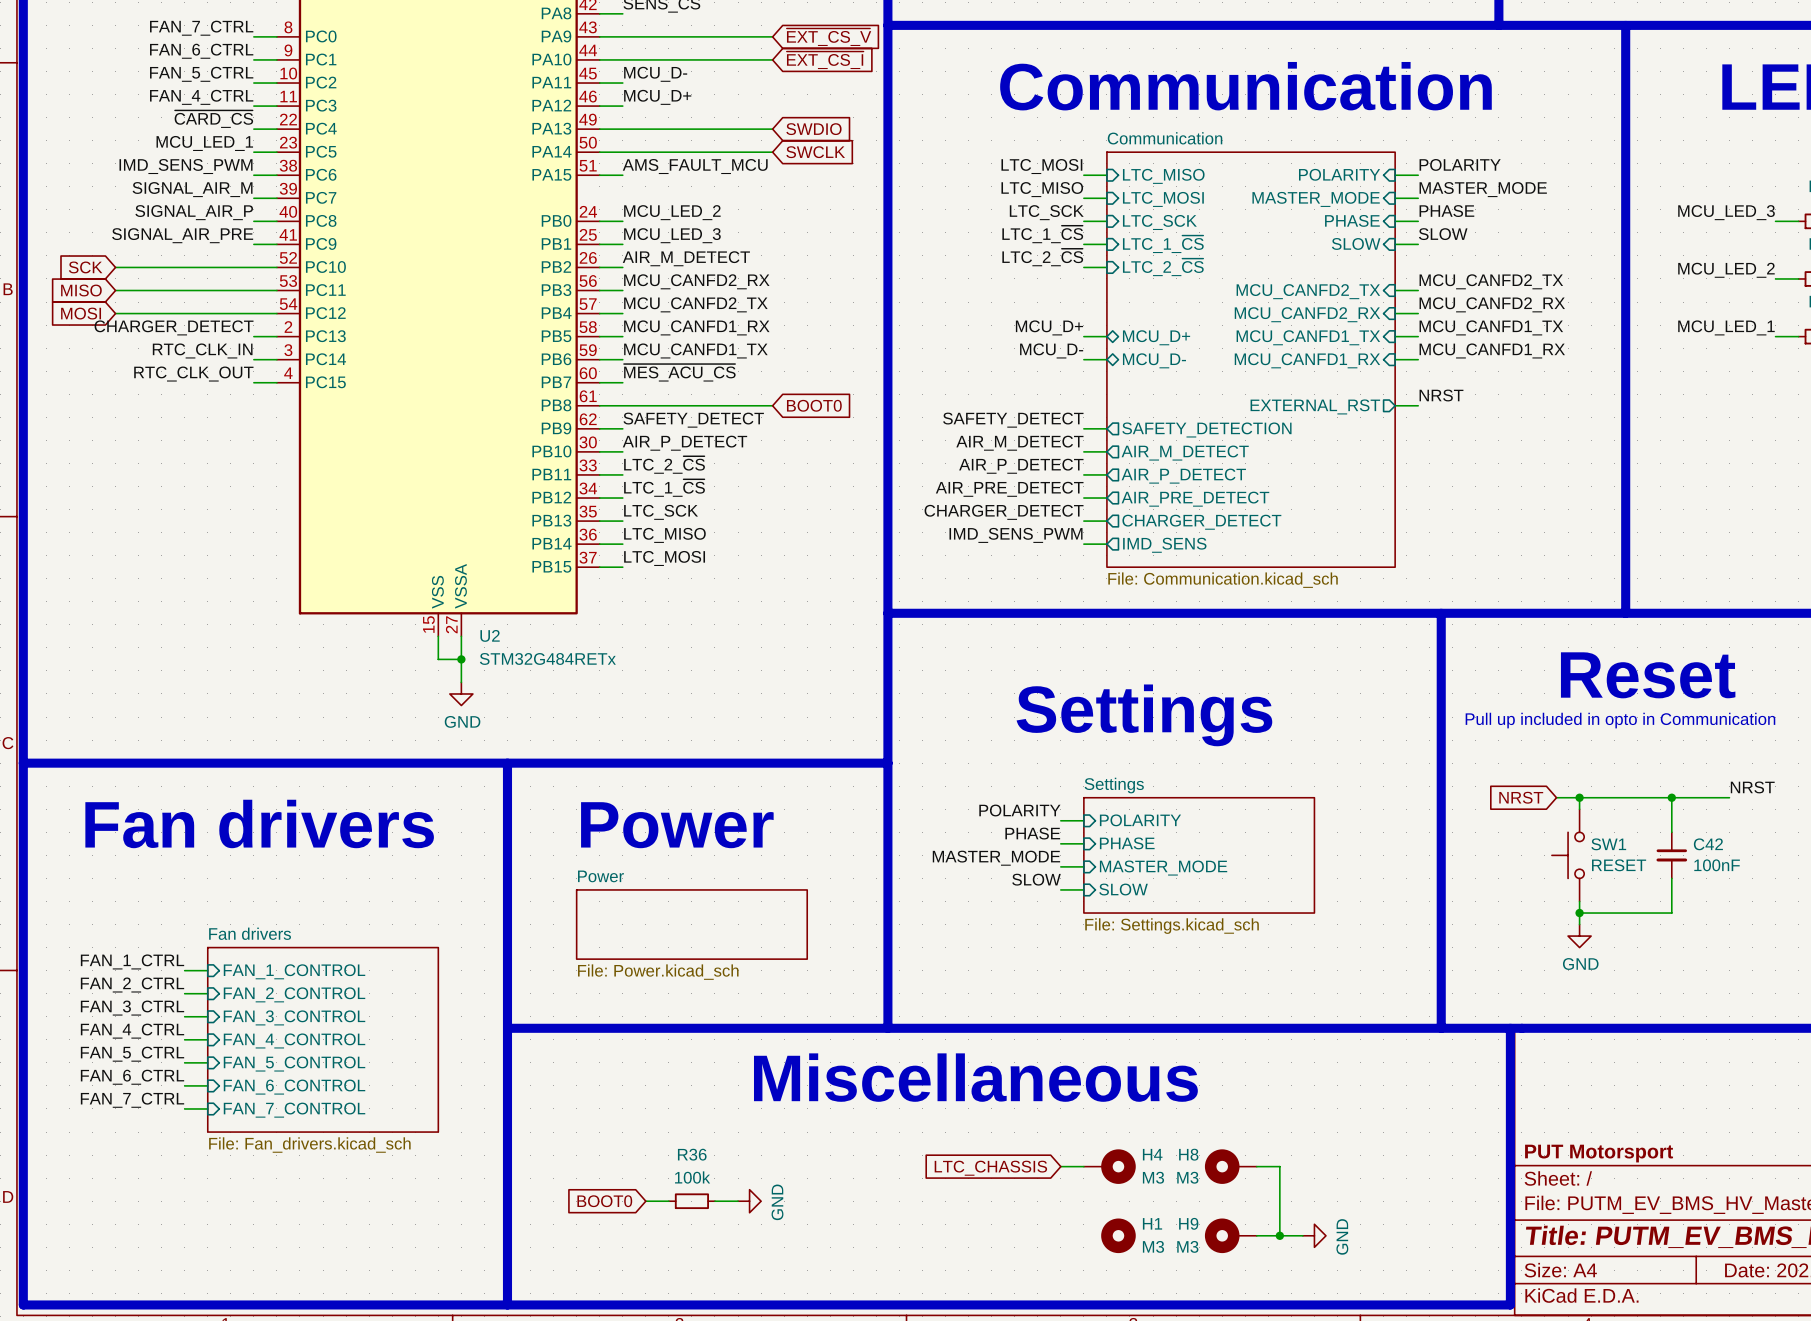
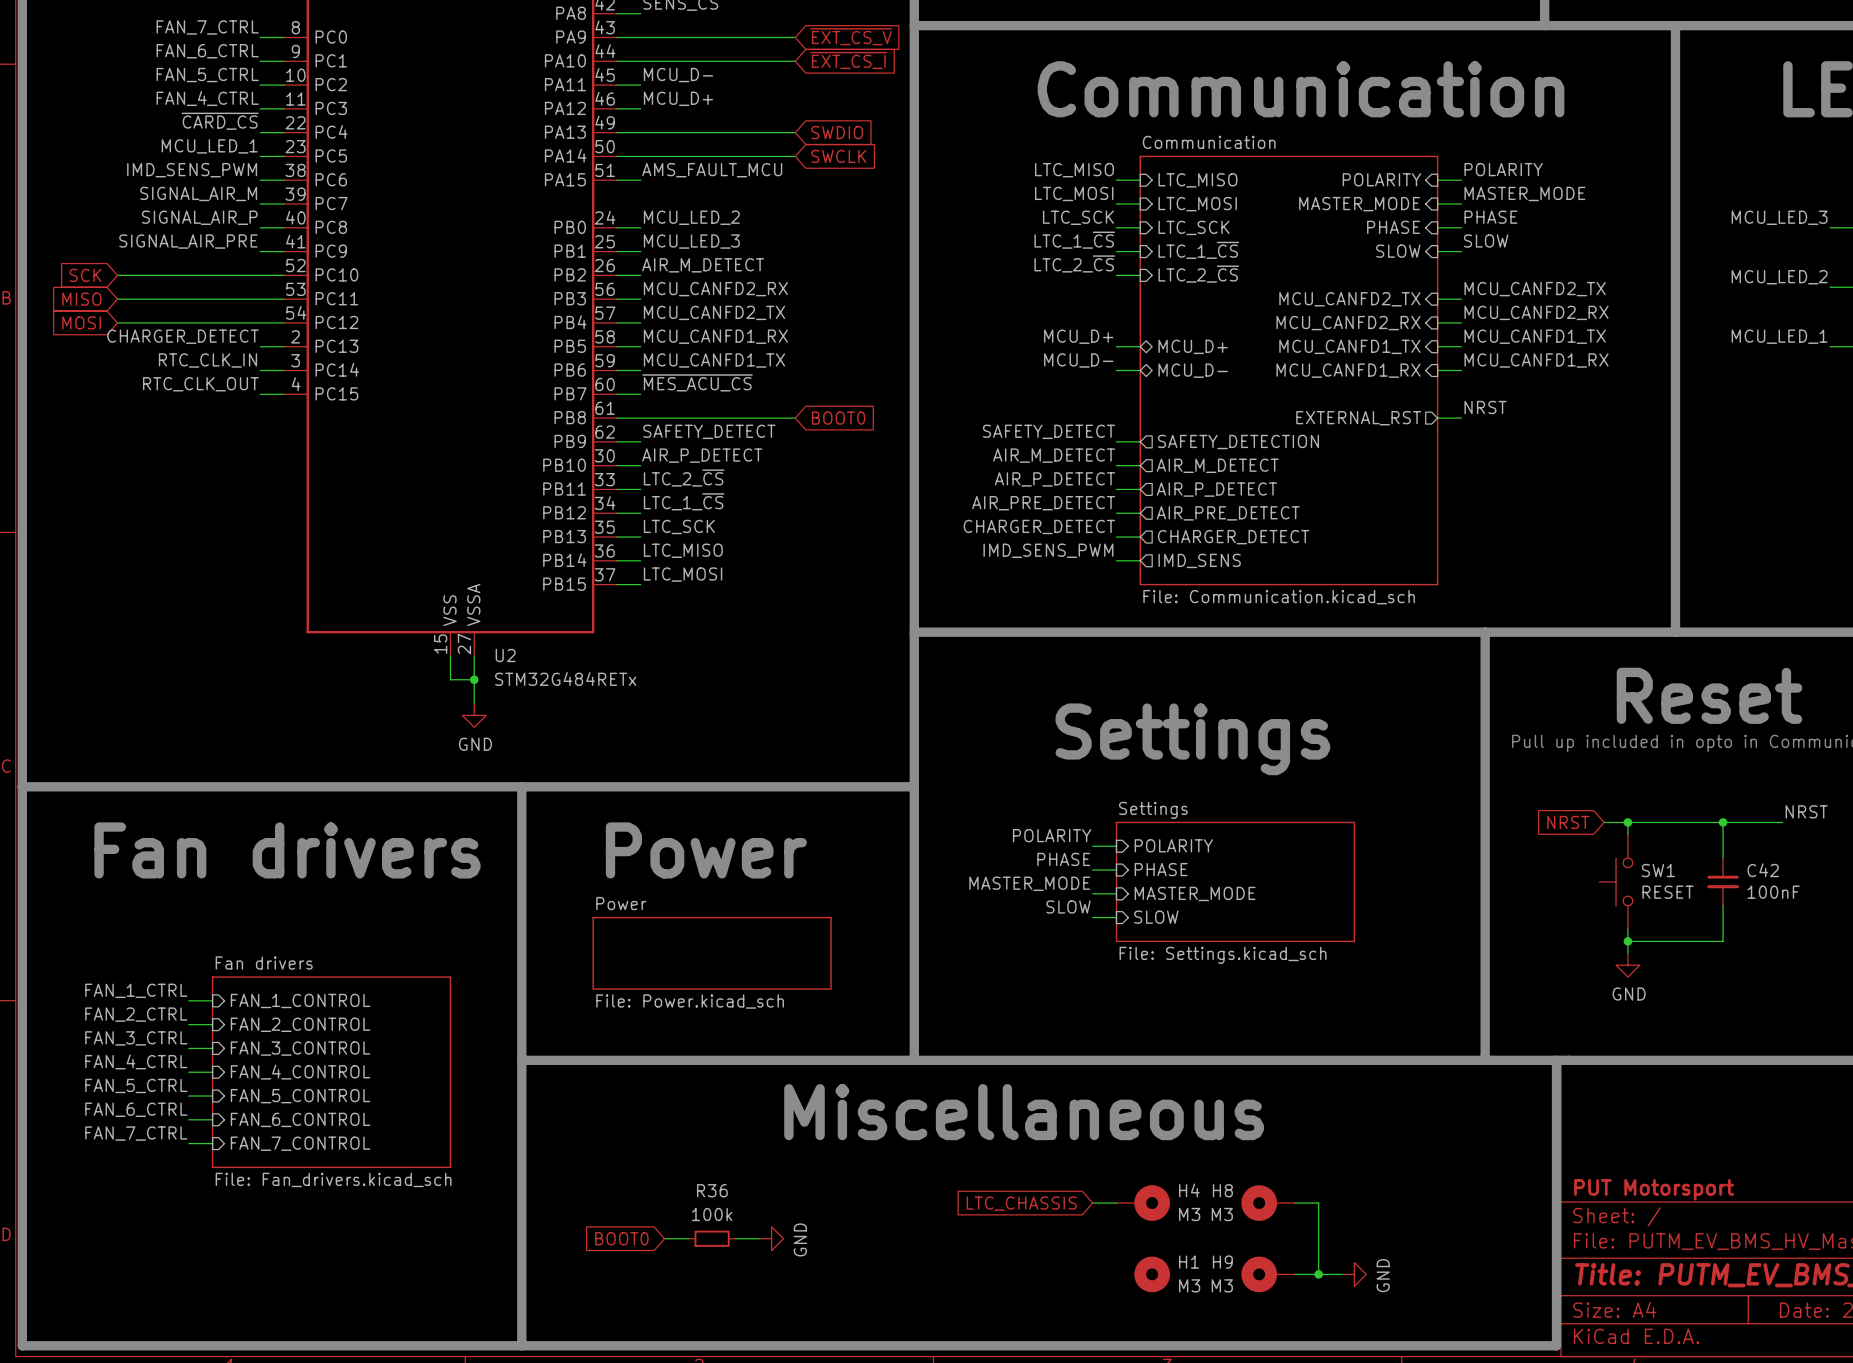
label: LTC_MOSI (1041, 166) -> LTC_MISO (1074, 170)
label: LTC_MISO (1042, 189) -> LTC_MOSI (1074, 193)

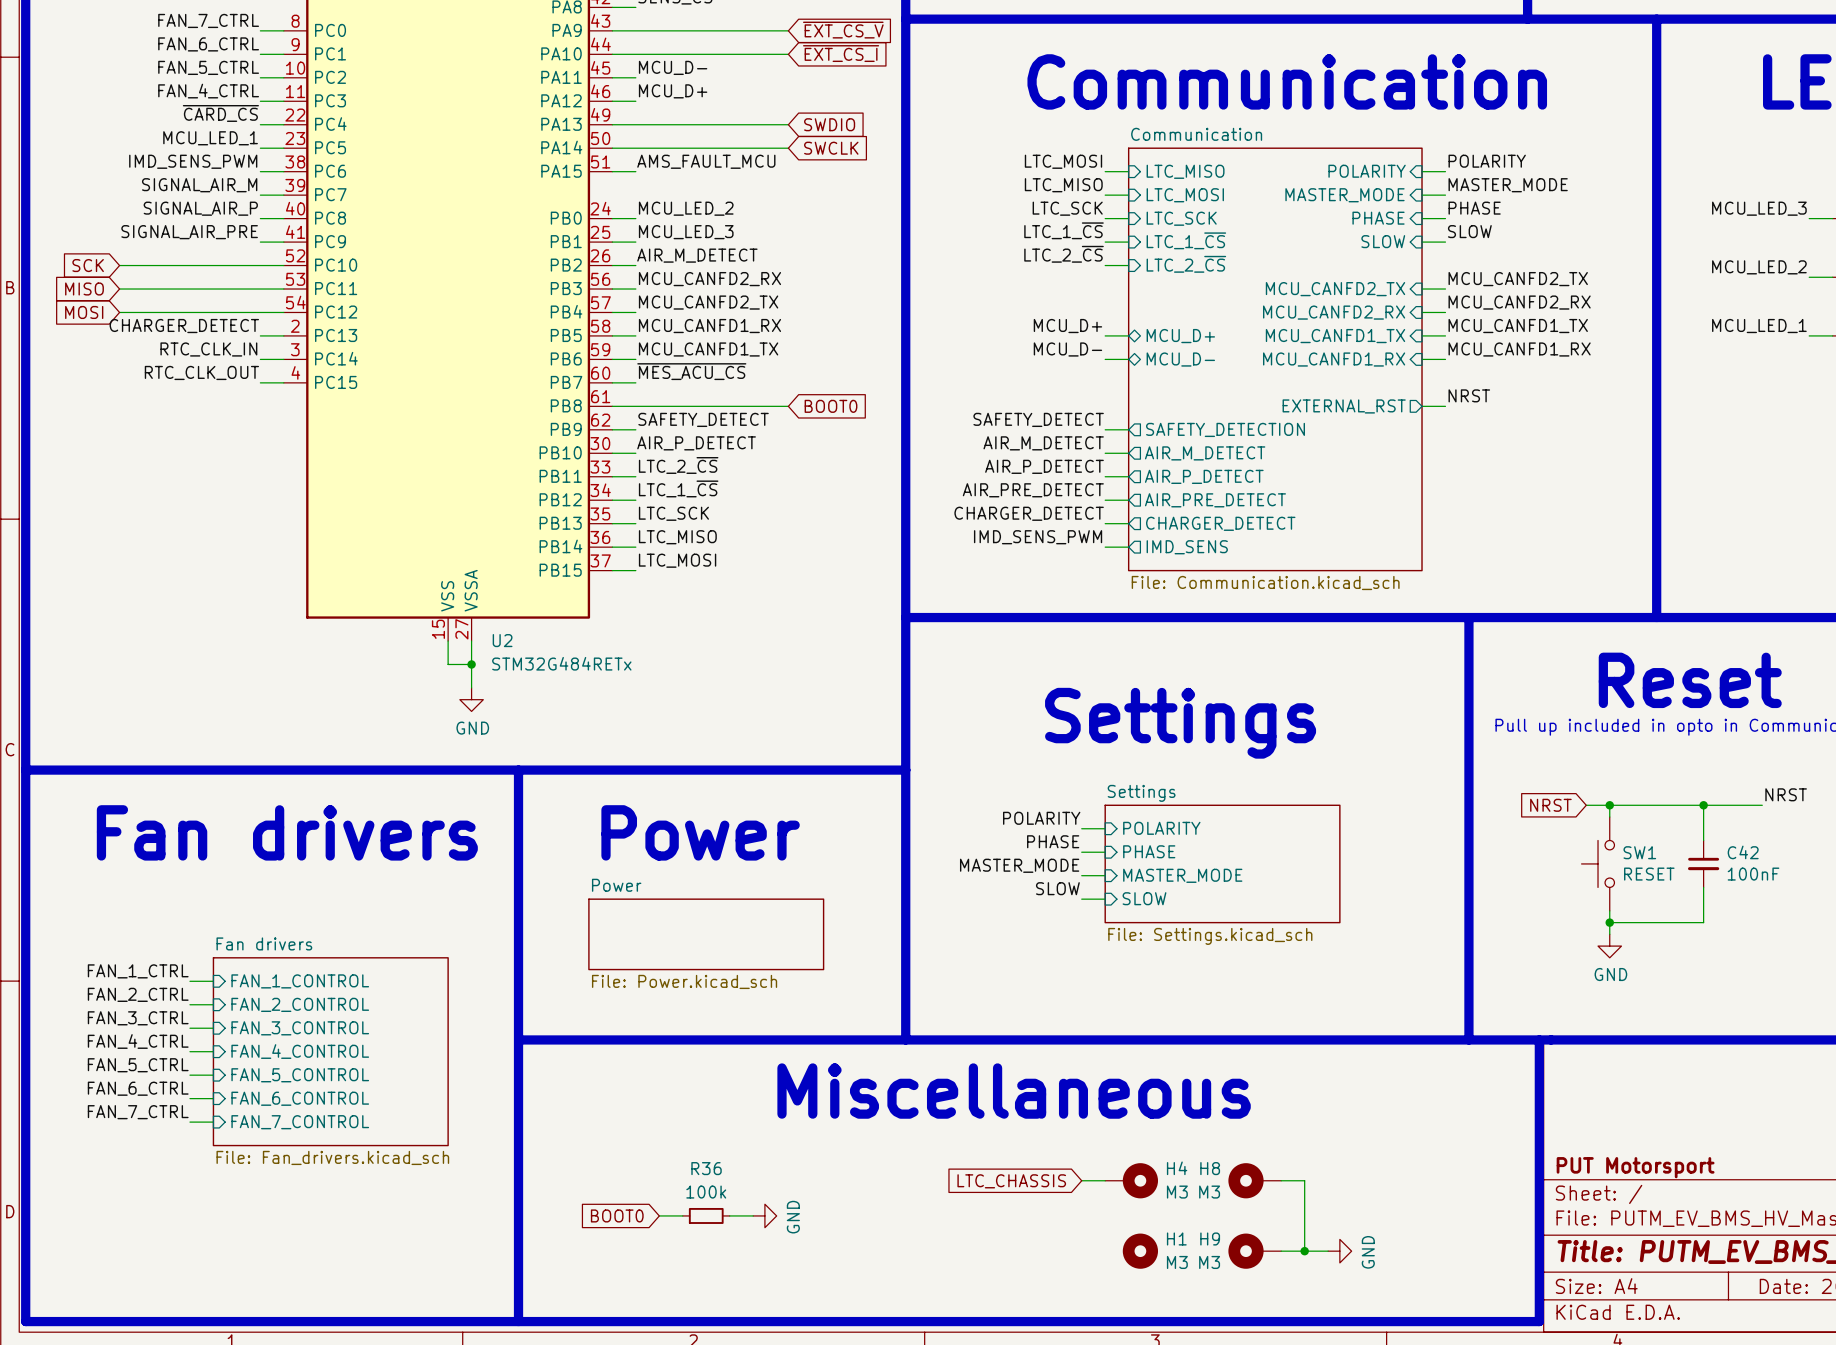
label: LTC_MISO (1074, 170) -> LTC_MOSI (1063, 161)
label: LTC_MOSI (1074, 193) -> LTC_MISO (1063, 185)

